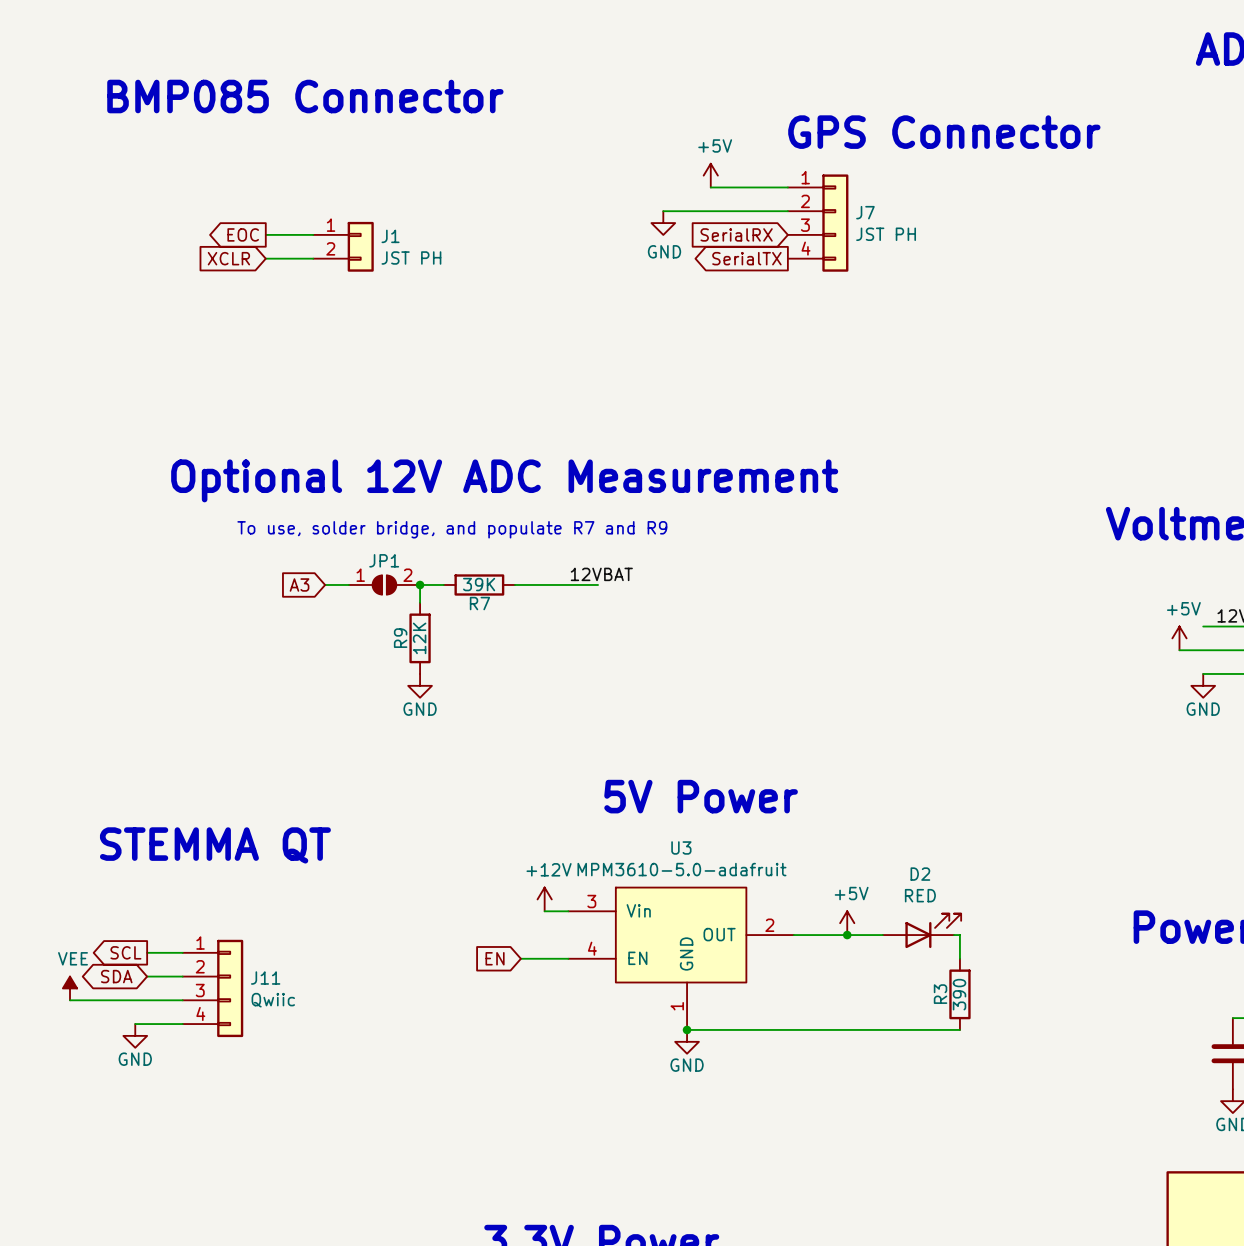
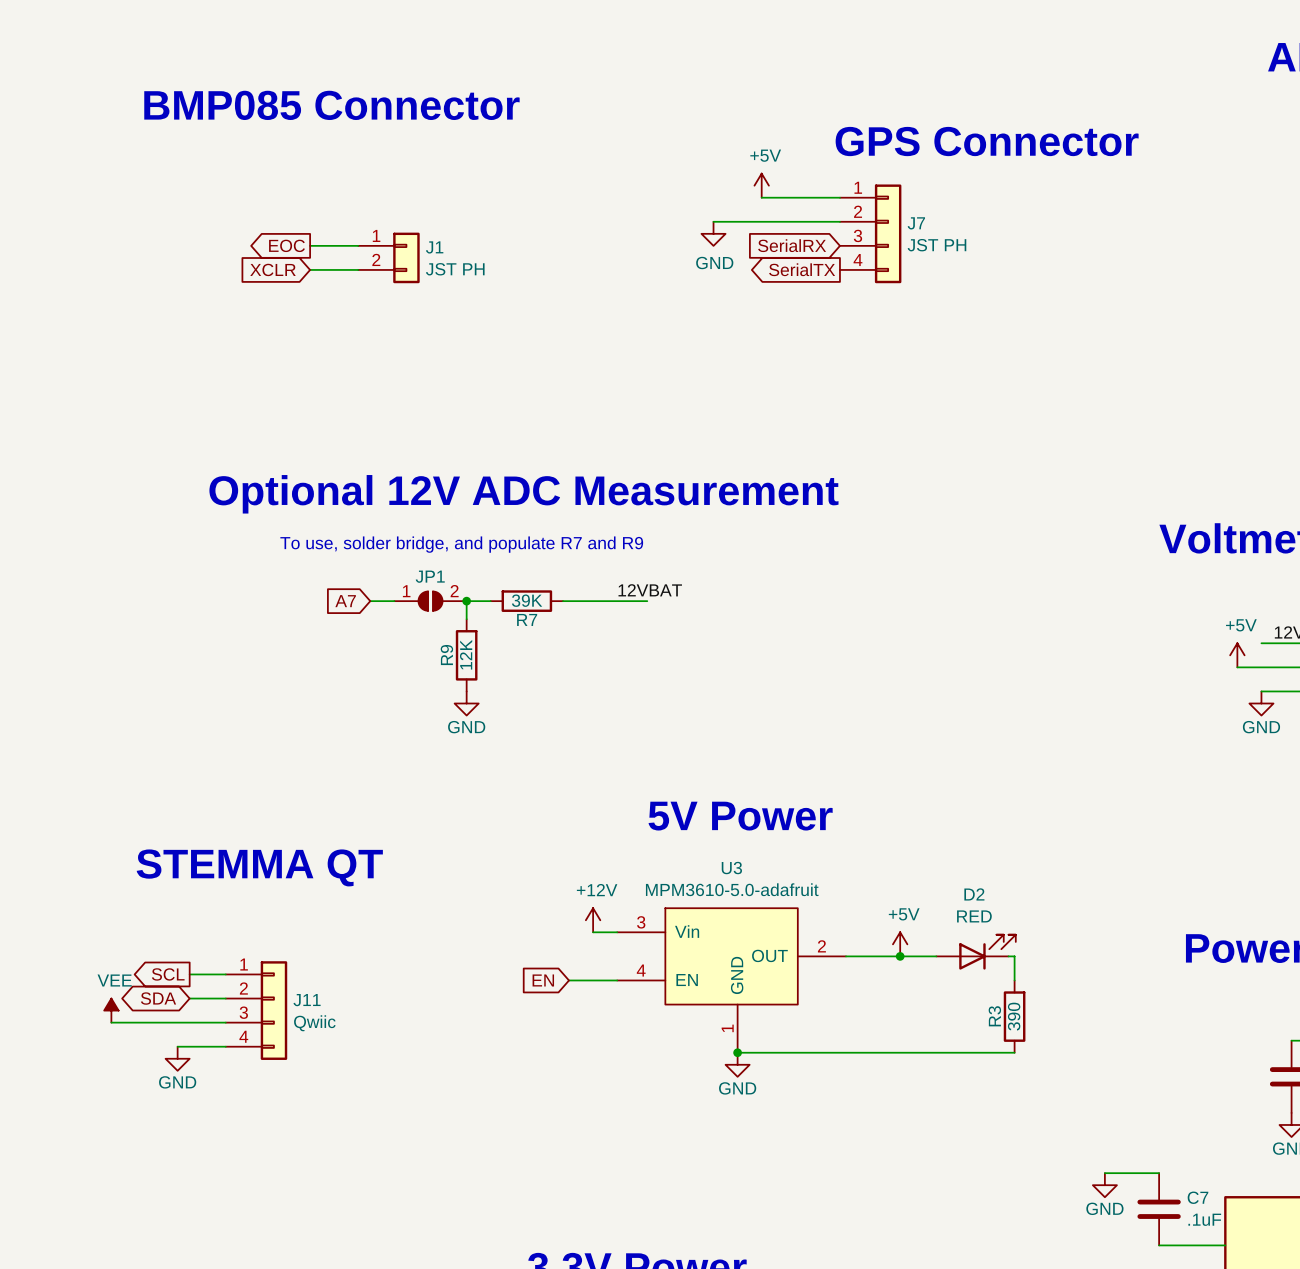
global label: A3 (299, 584) -> A7 (345, 601)
wire: none -> (1104, 1173) (1159, 1173)
power symbol: none -> GND (1104, 1185)
C7: none -> .1uF (1159, 1209)
wire: none -> (1159, 1245) (1225, 1245)

